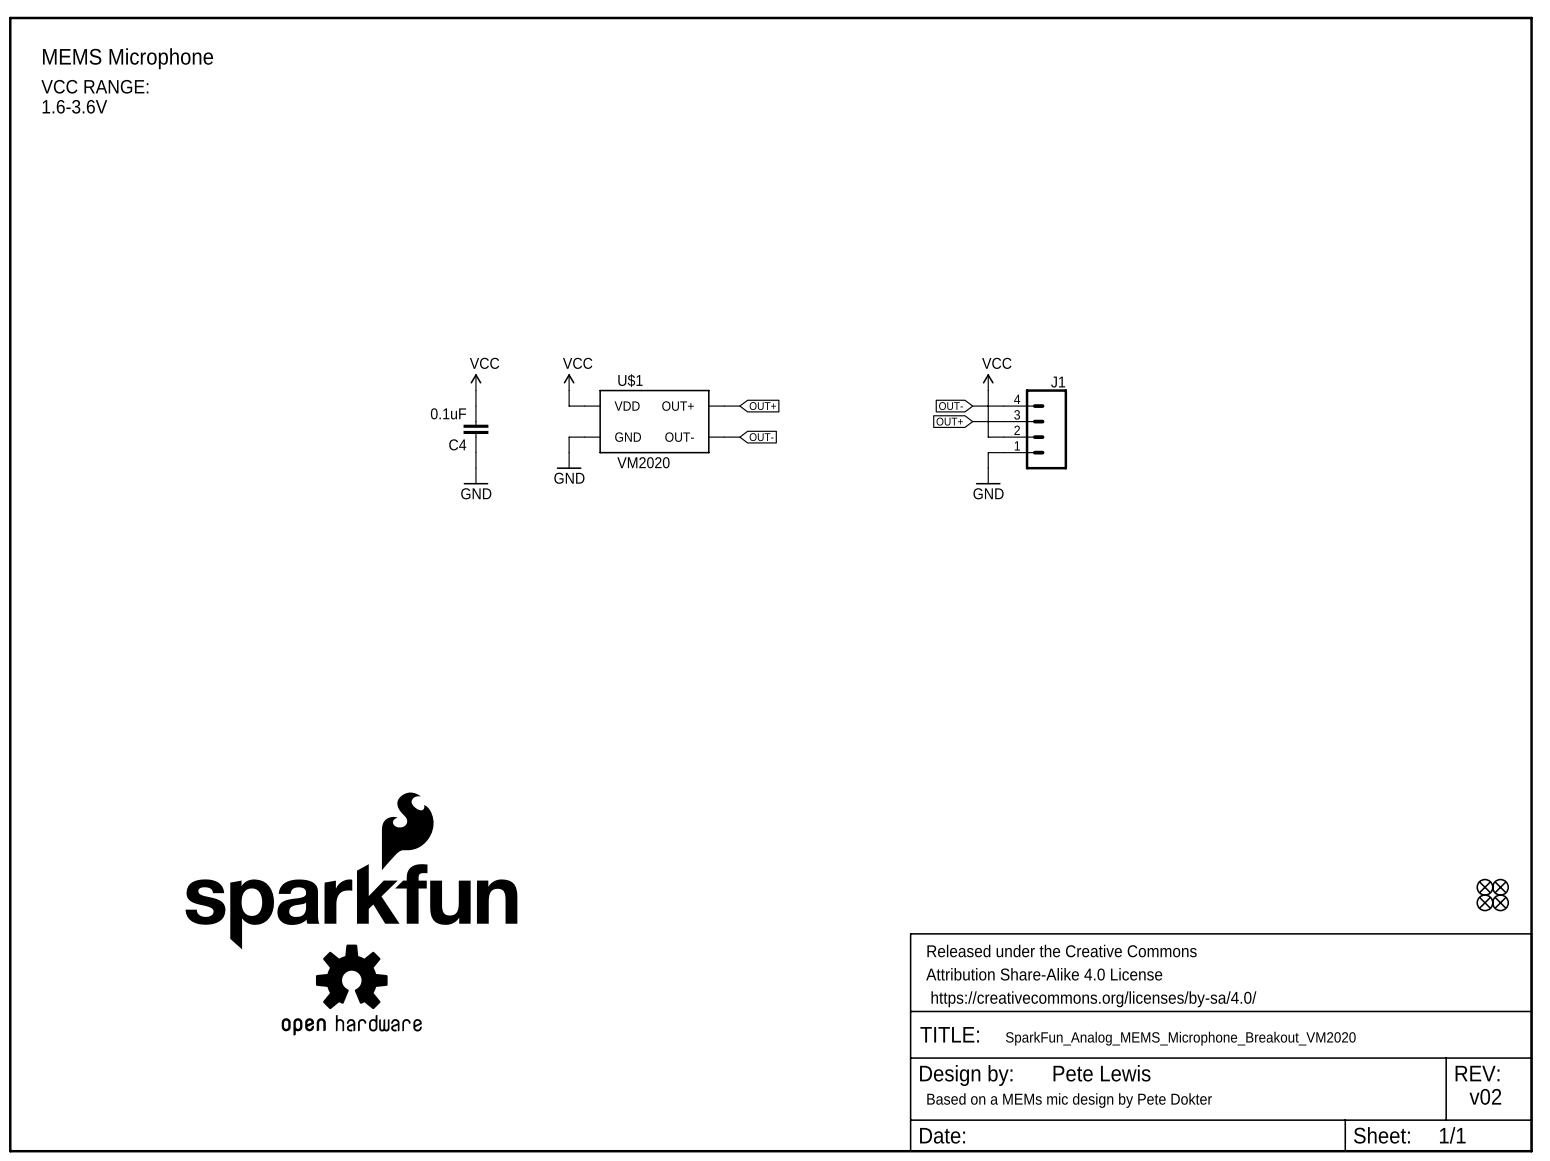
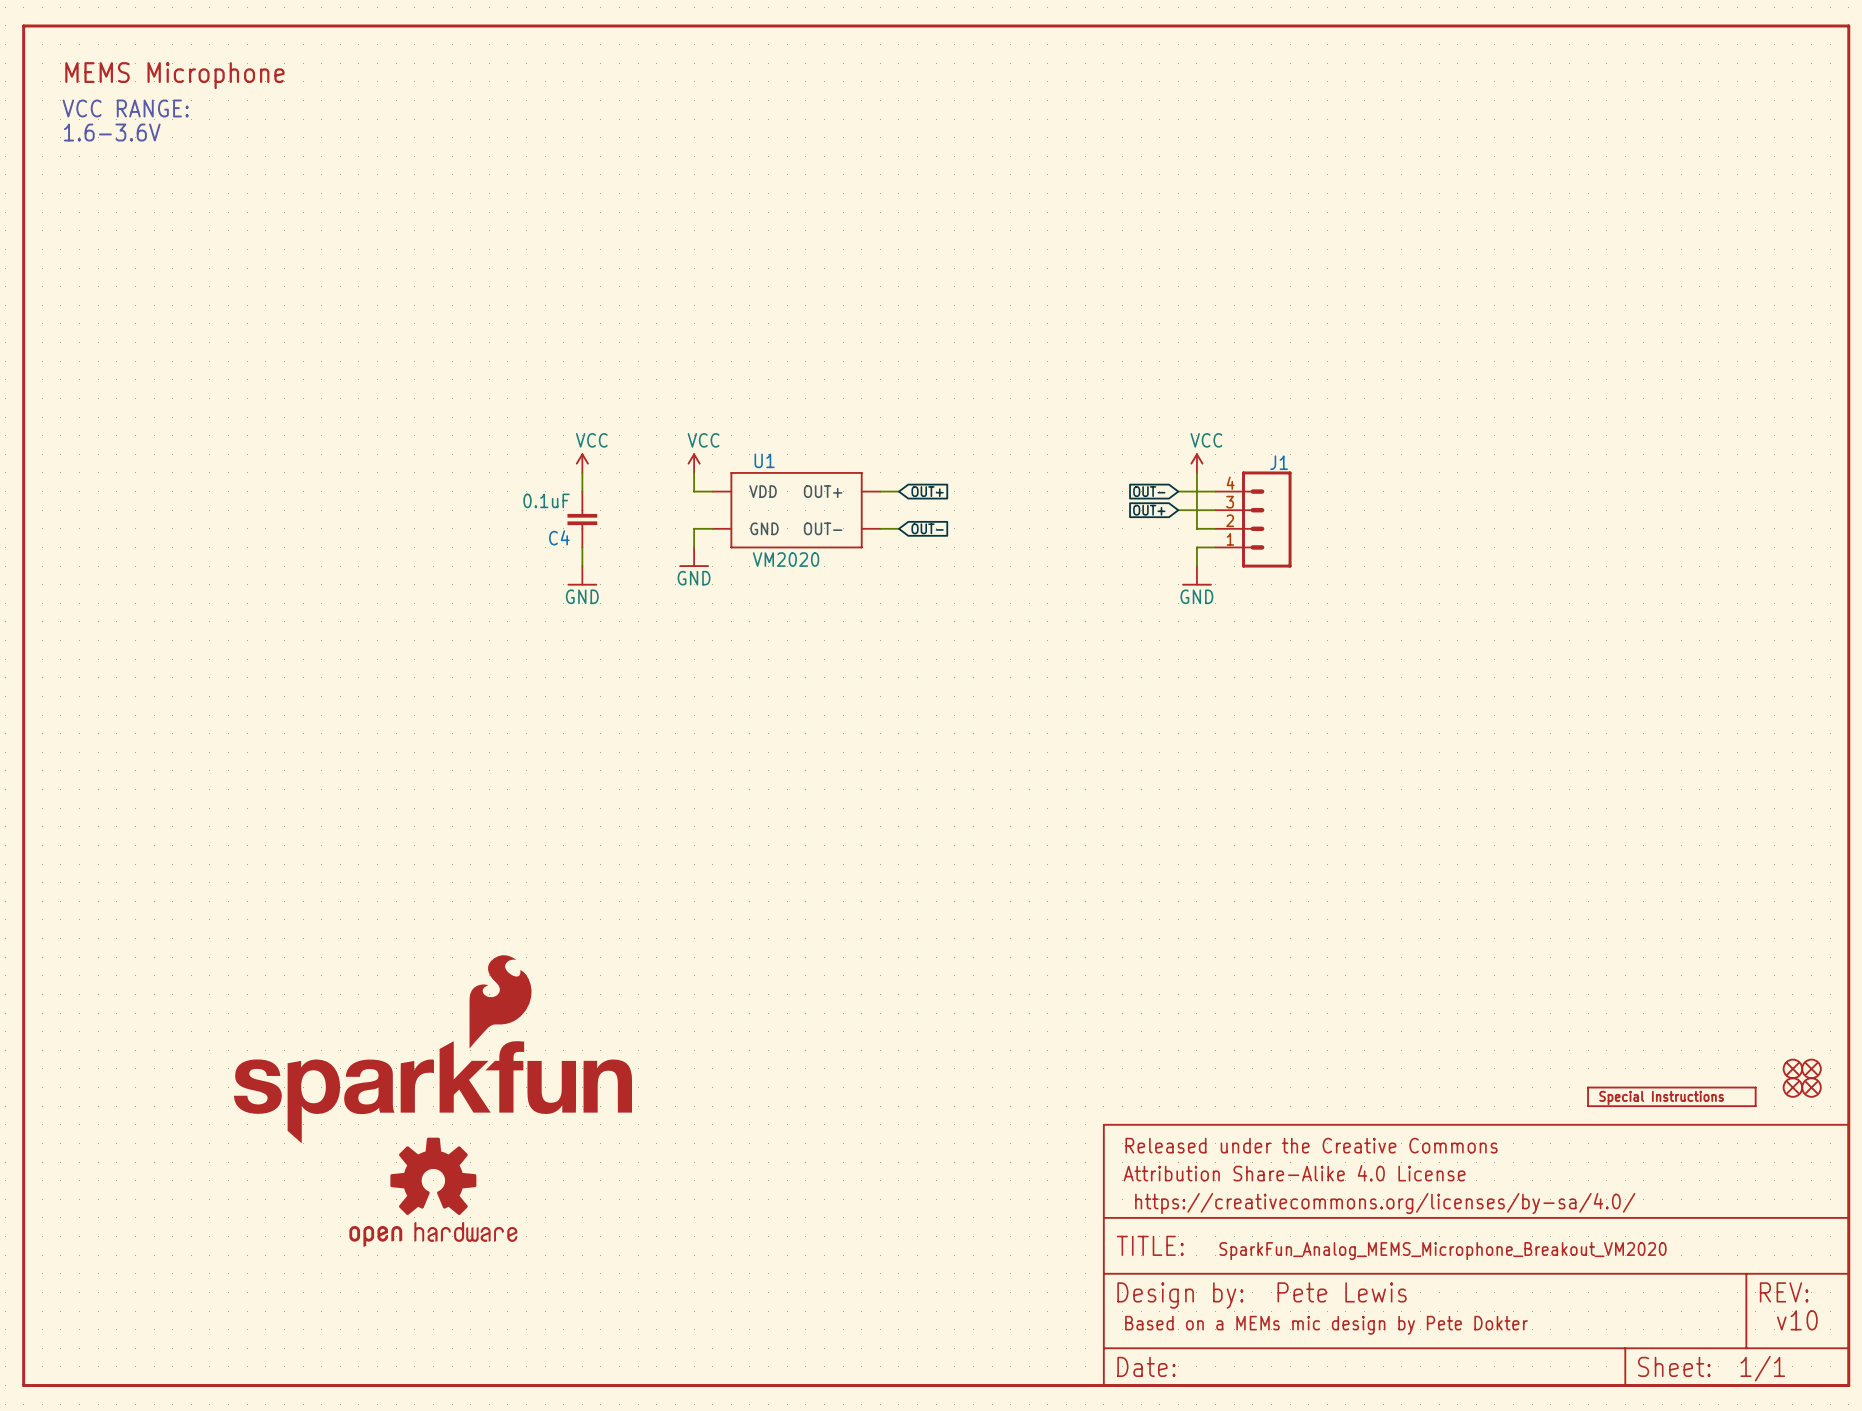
U$1 name: U$1 (630, 380) -> U1 (764, 460)
part: none -> (1671, 1096)
text: v02 (1485, 1096) -> v10 (1797, 1320)

